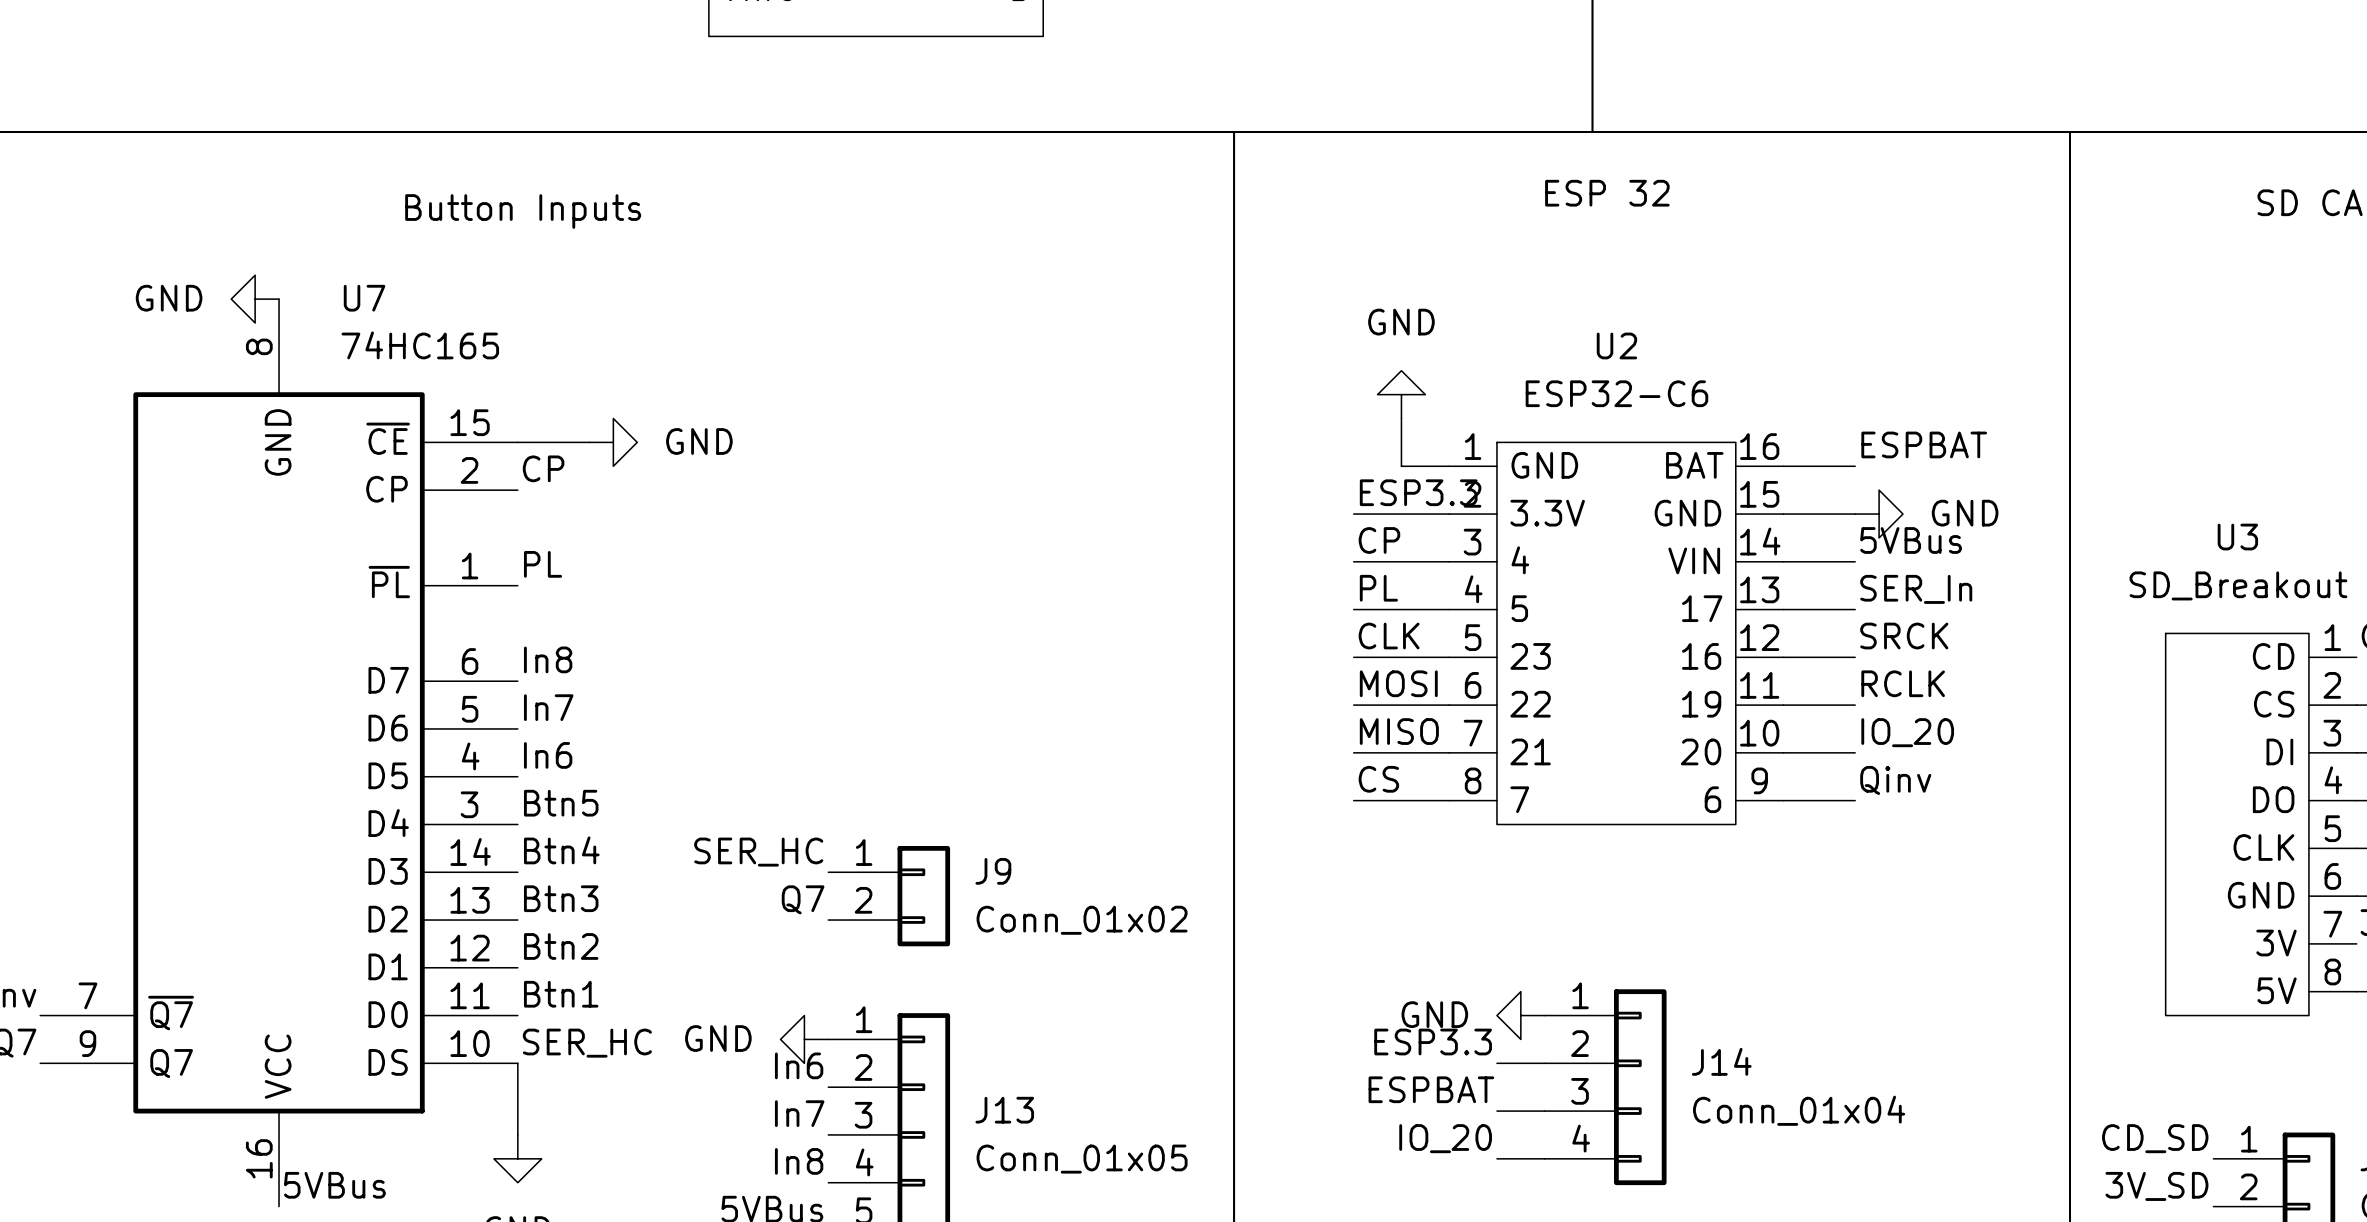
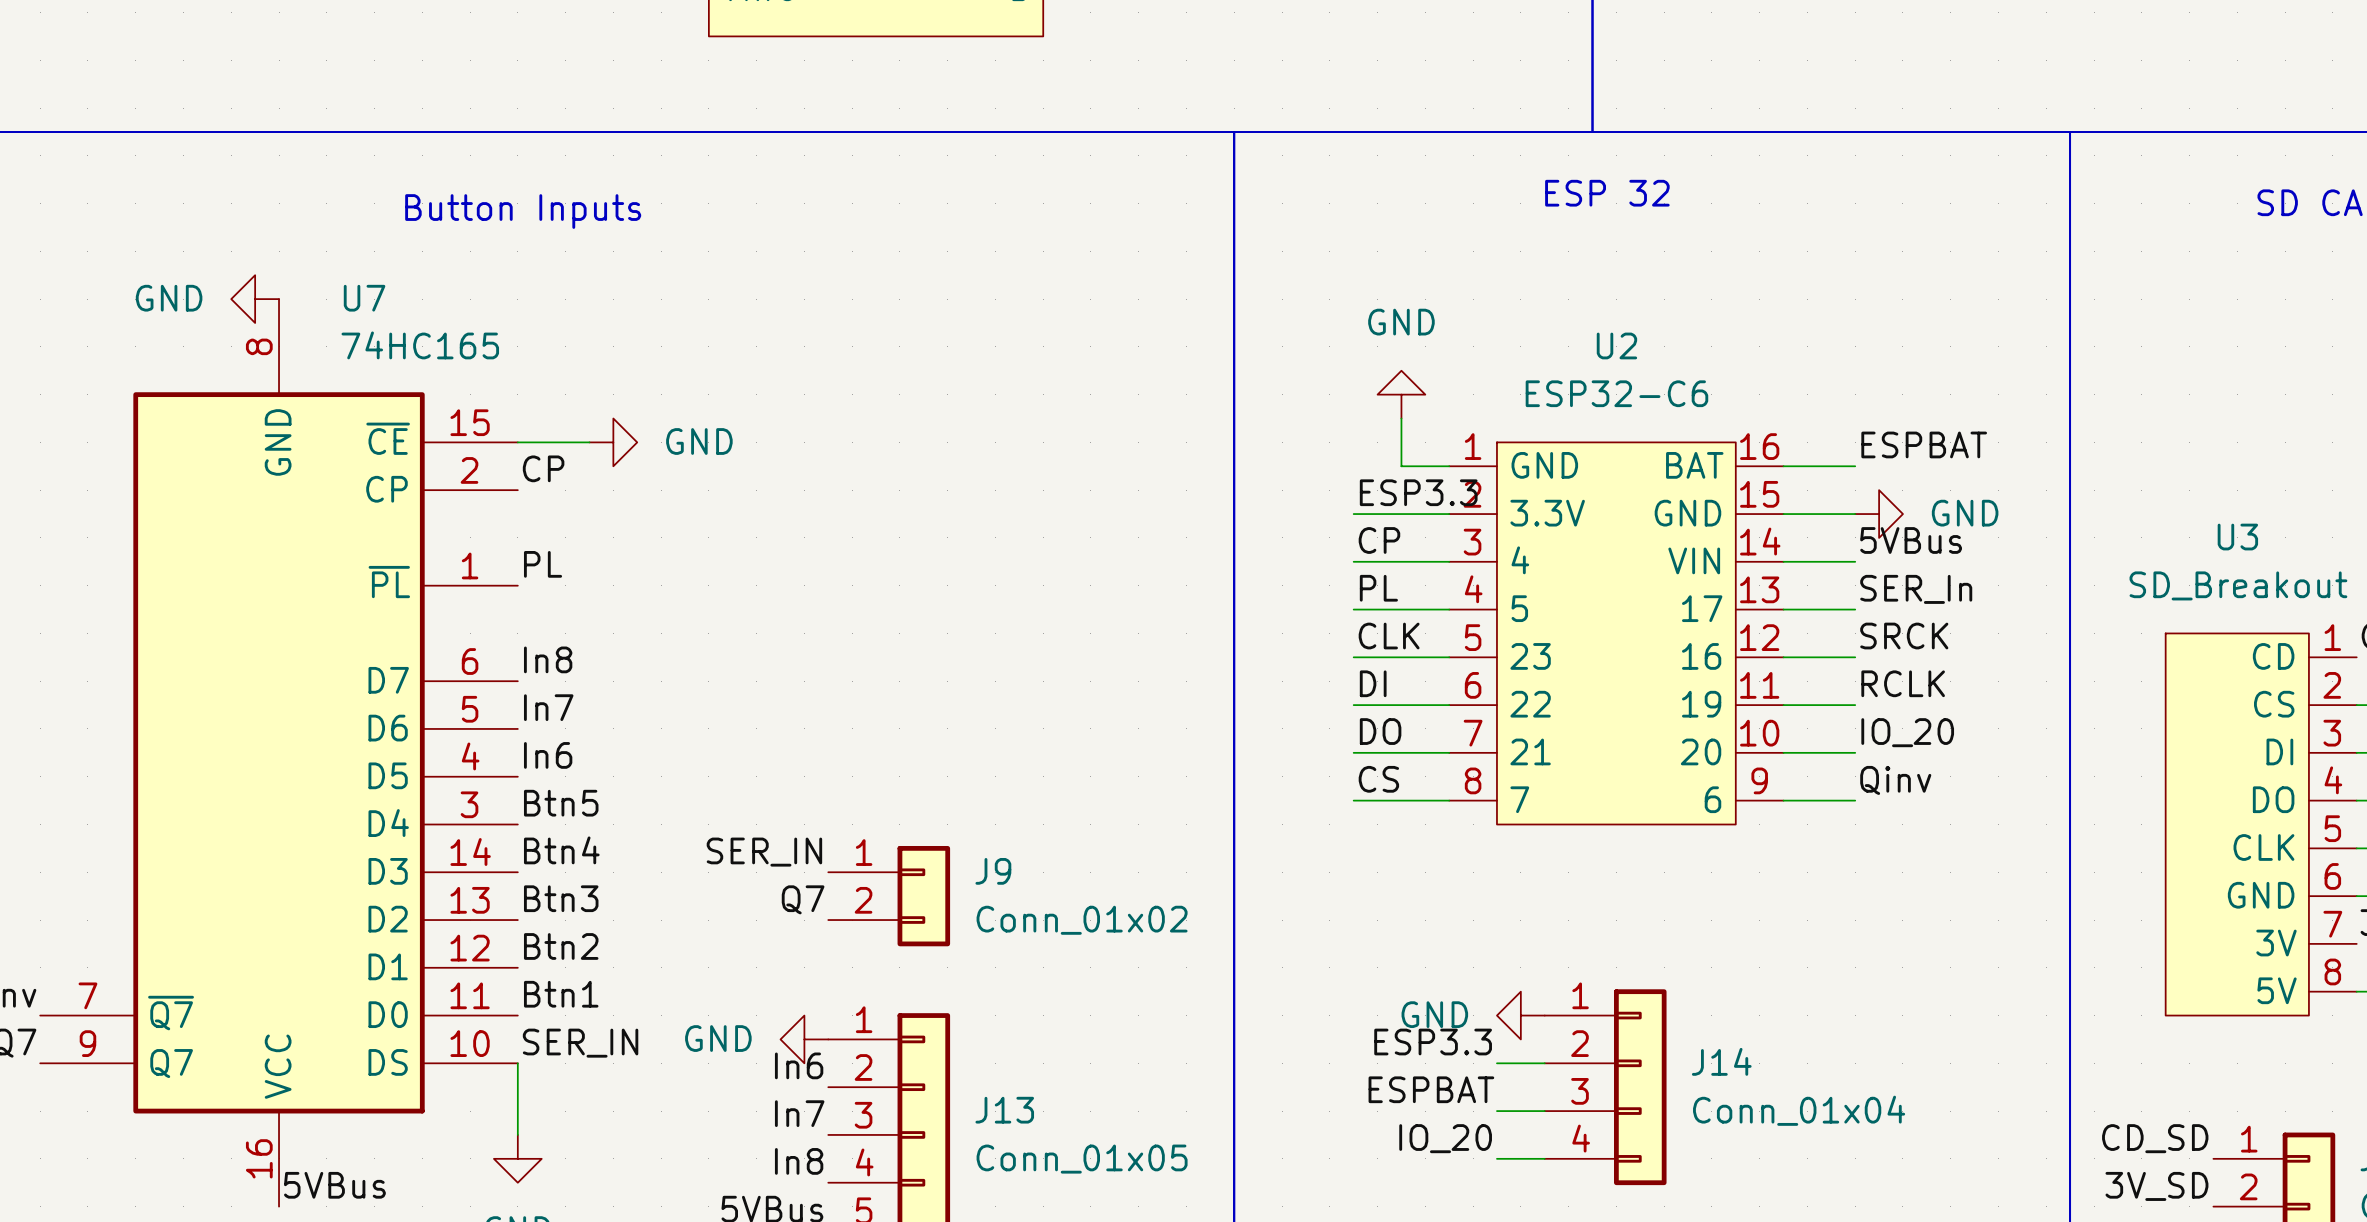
label: MOSI (1398, 683) -> DI (1373, 683)
label: MISO (1399, 731) -> DO (1380, 731)
label: SER_HC (758, 852) -> SER_IN (764, 852)
label: SER_HC (587, 1043) -> SER_IN (580, 1043)

